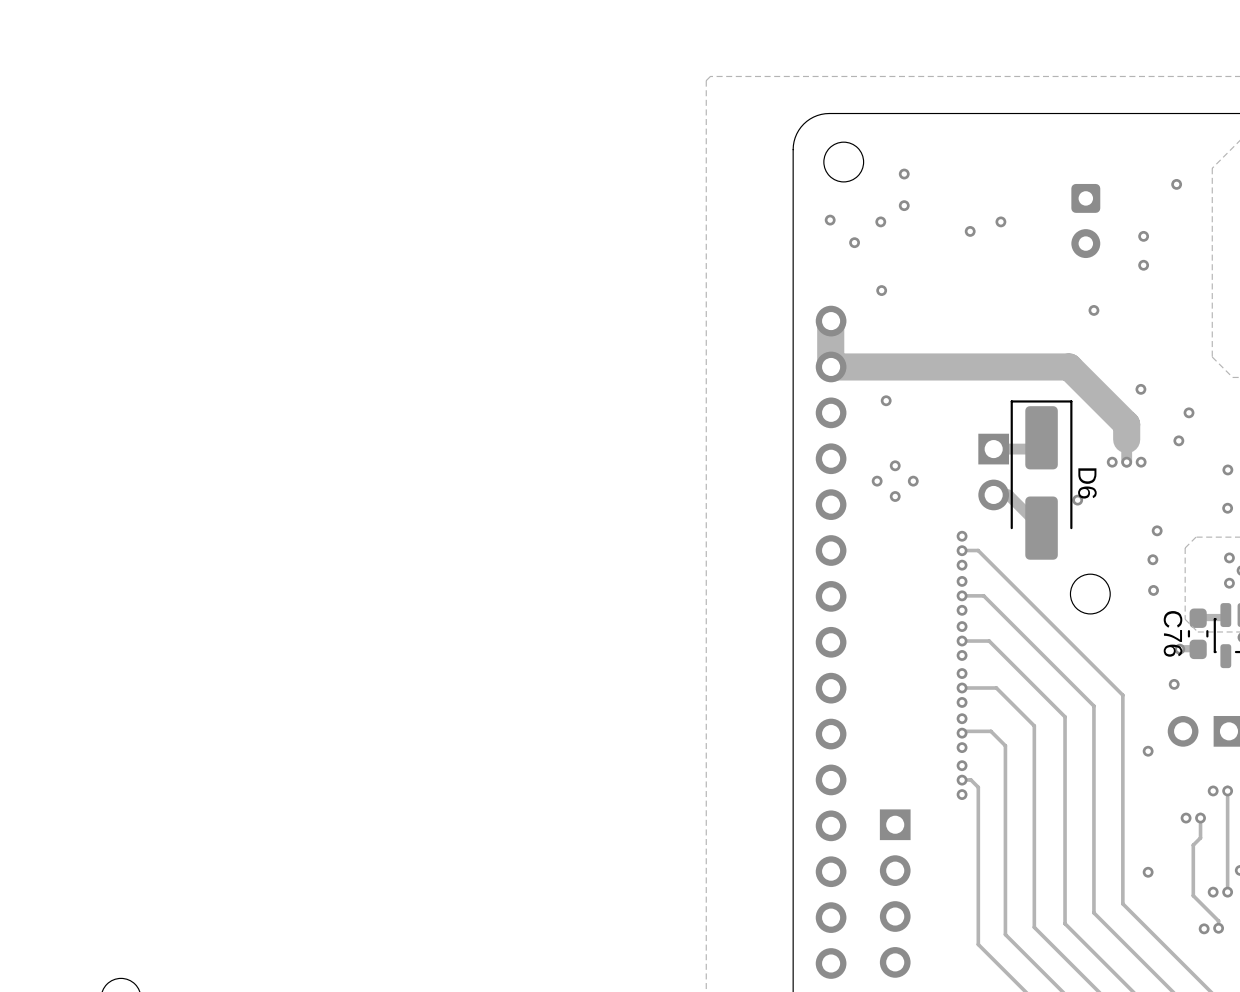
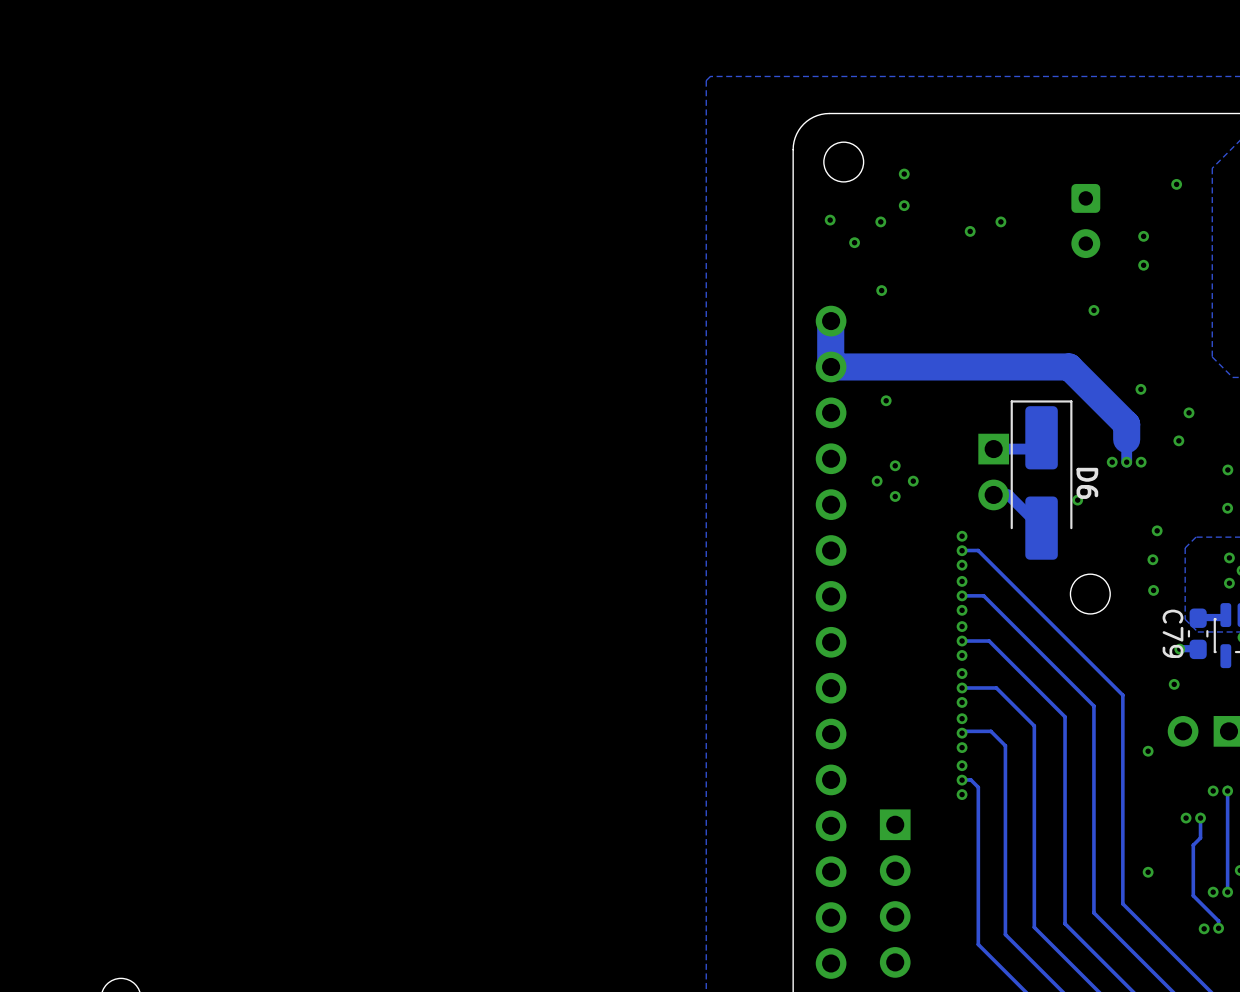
C76 name: C76 (1173, 633) -> C79 (1173, 633)

